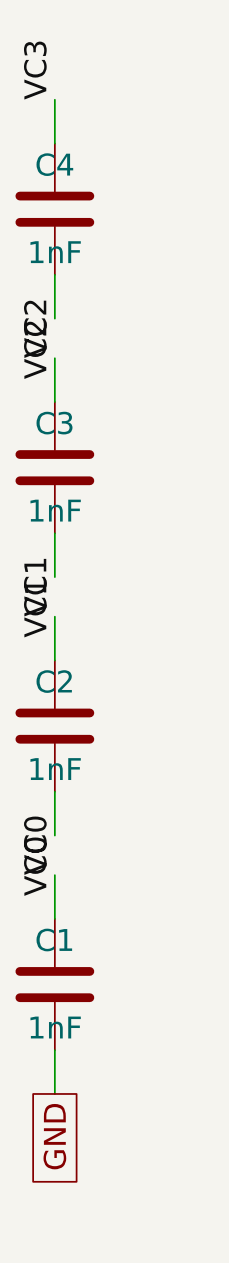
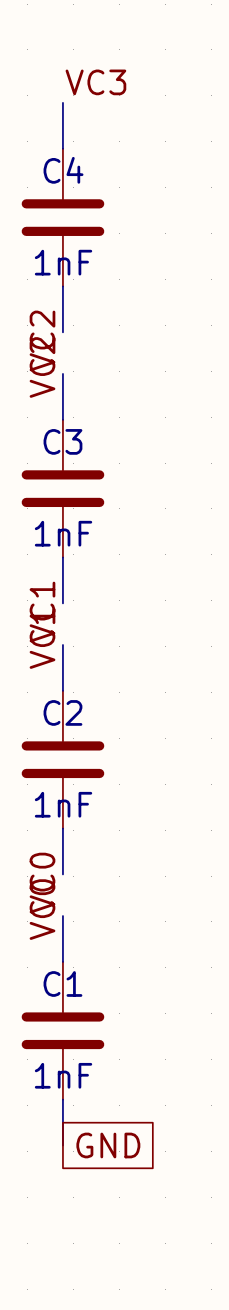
label rotation: 0° (35, 70) -> 90° clockwise (95, 82)
global label rotation: 0° (54, 1136) -> 90° counterclockwise (108, 1145)

